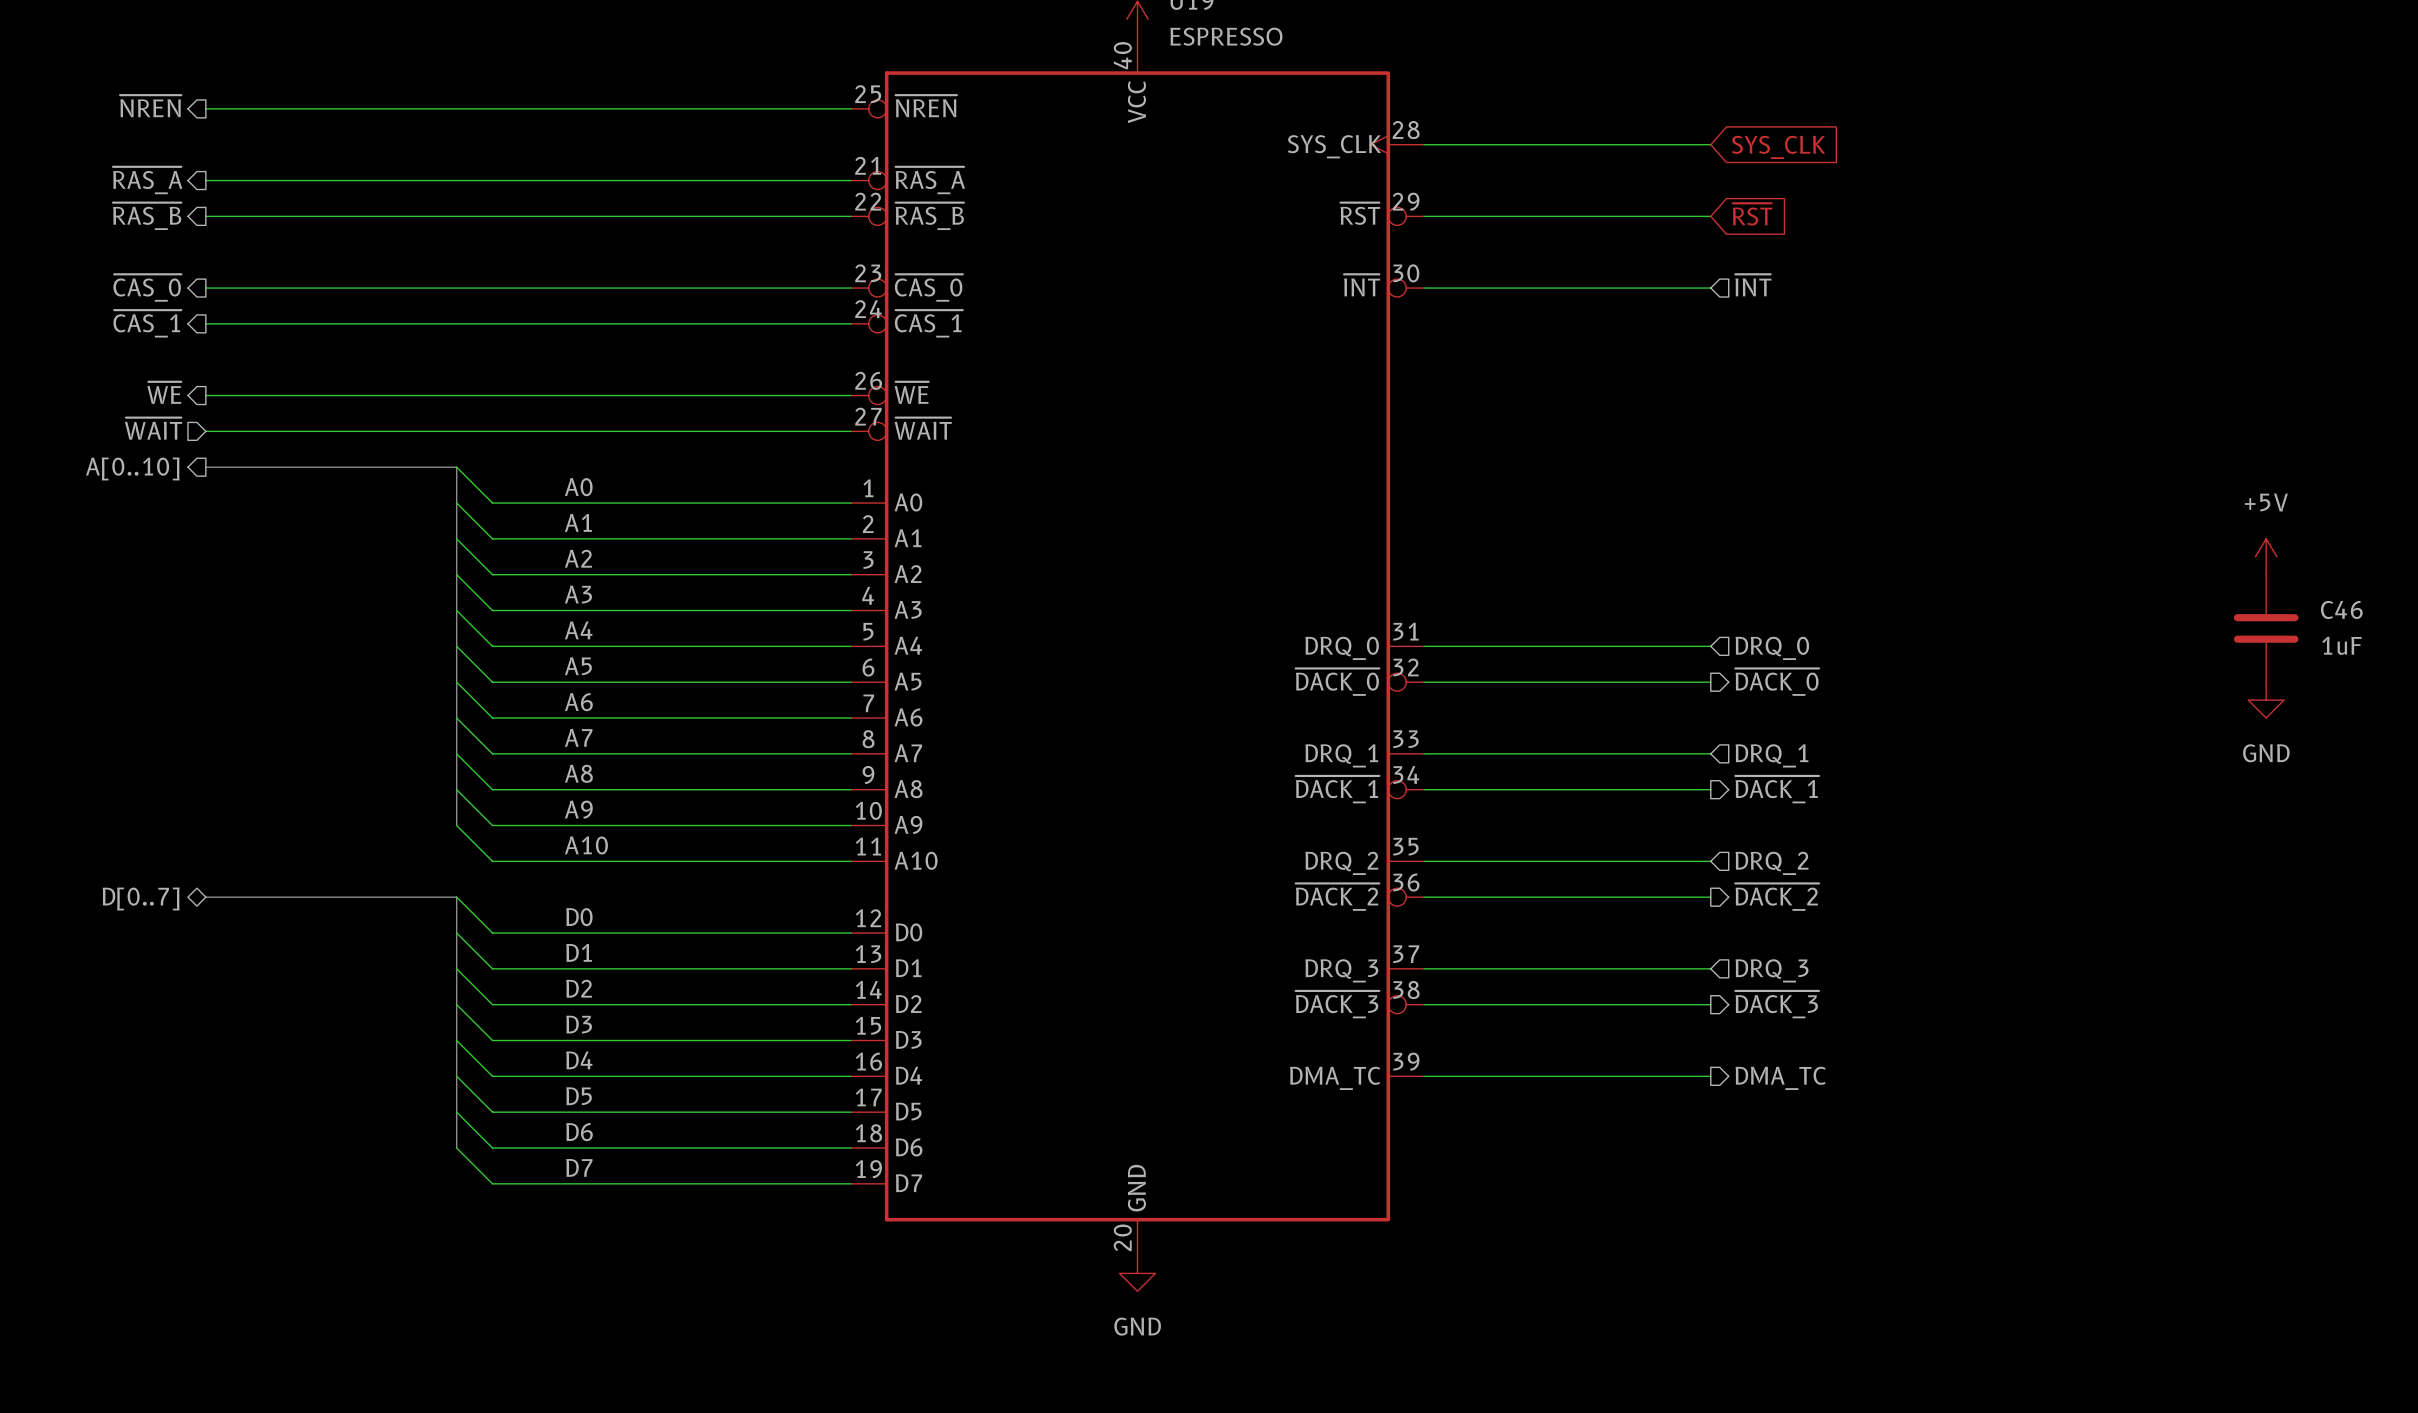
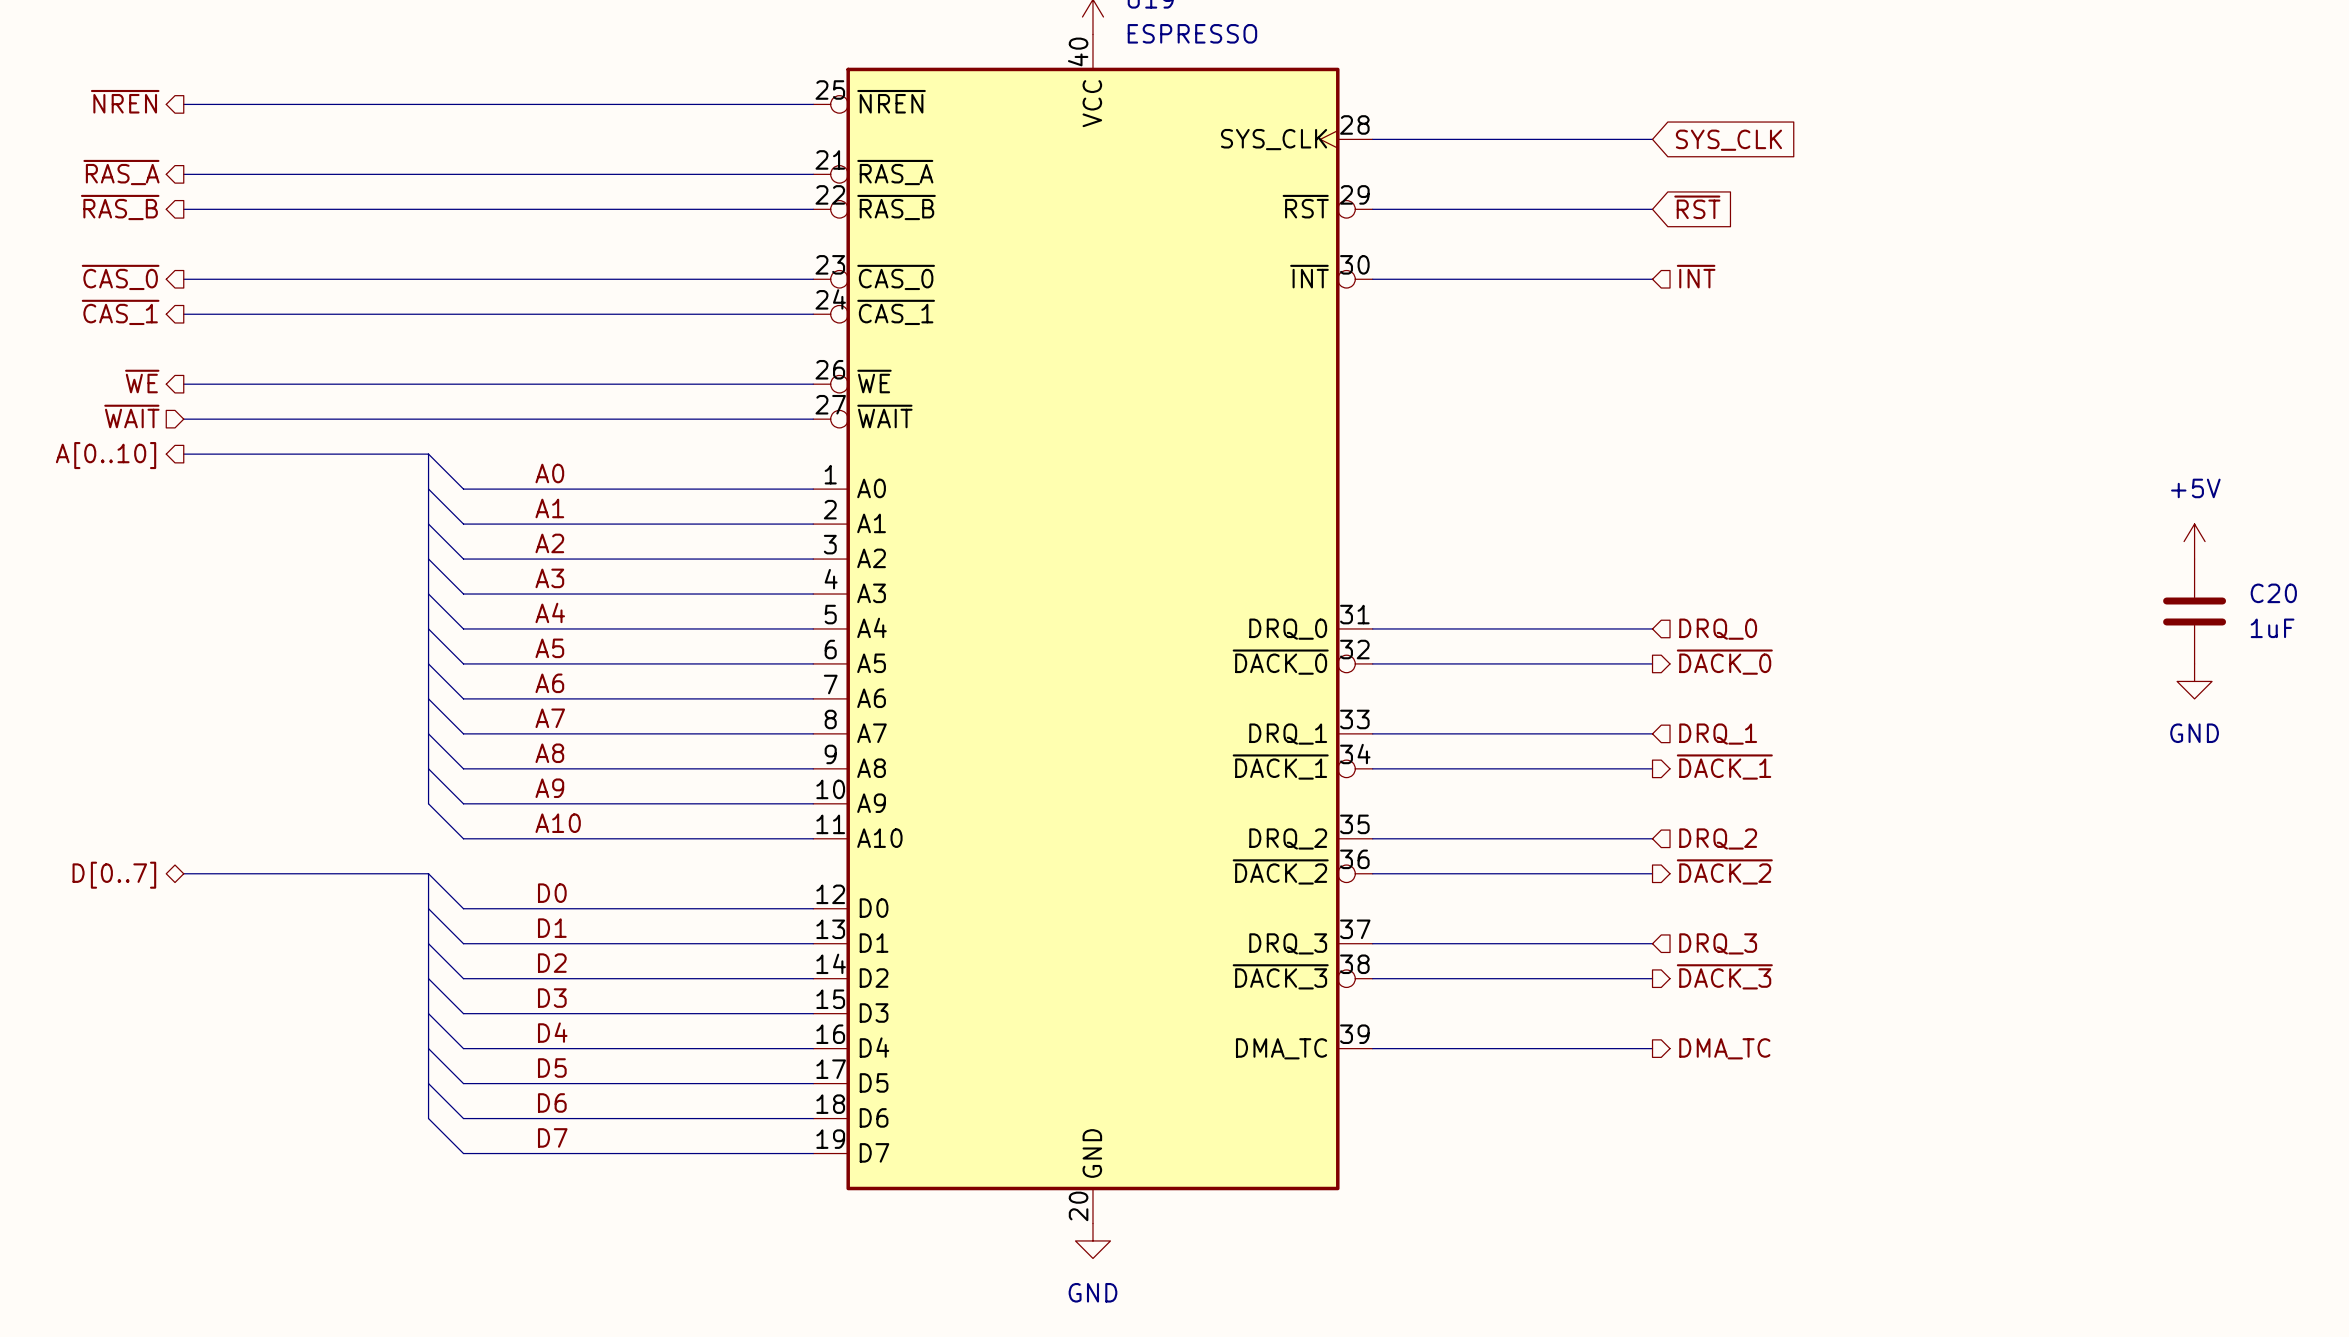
C46 name: C46 (2341, 609) -> C20 (2273, 593)

